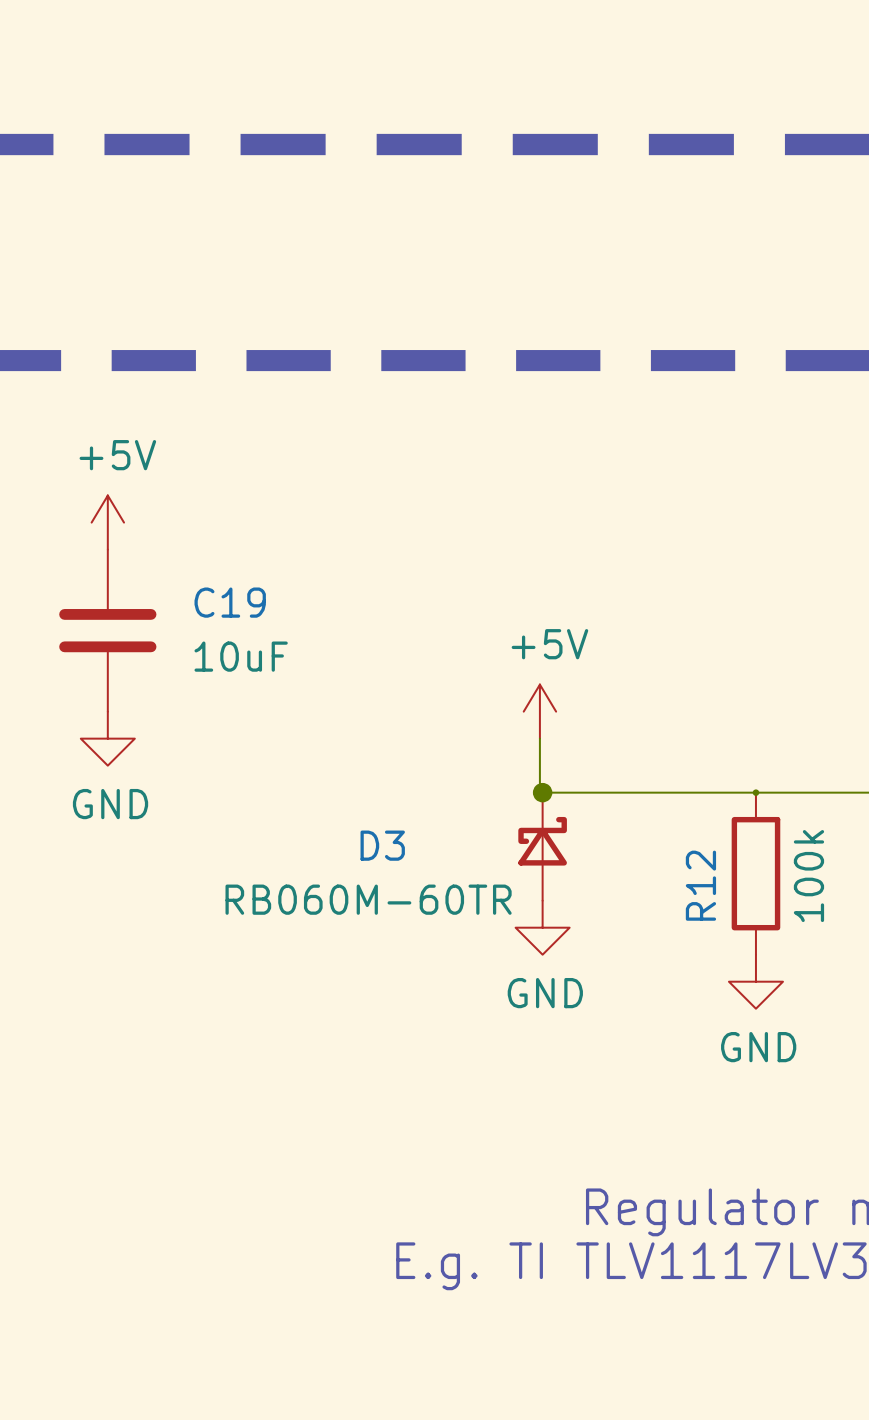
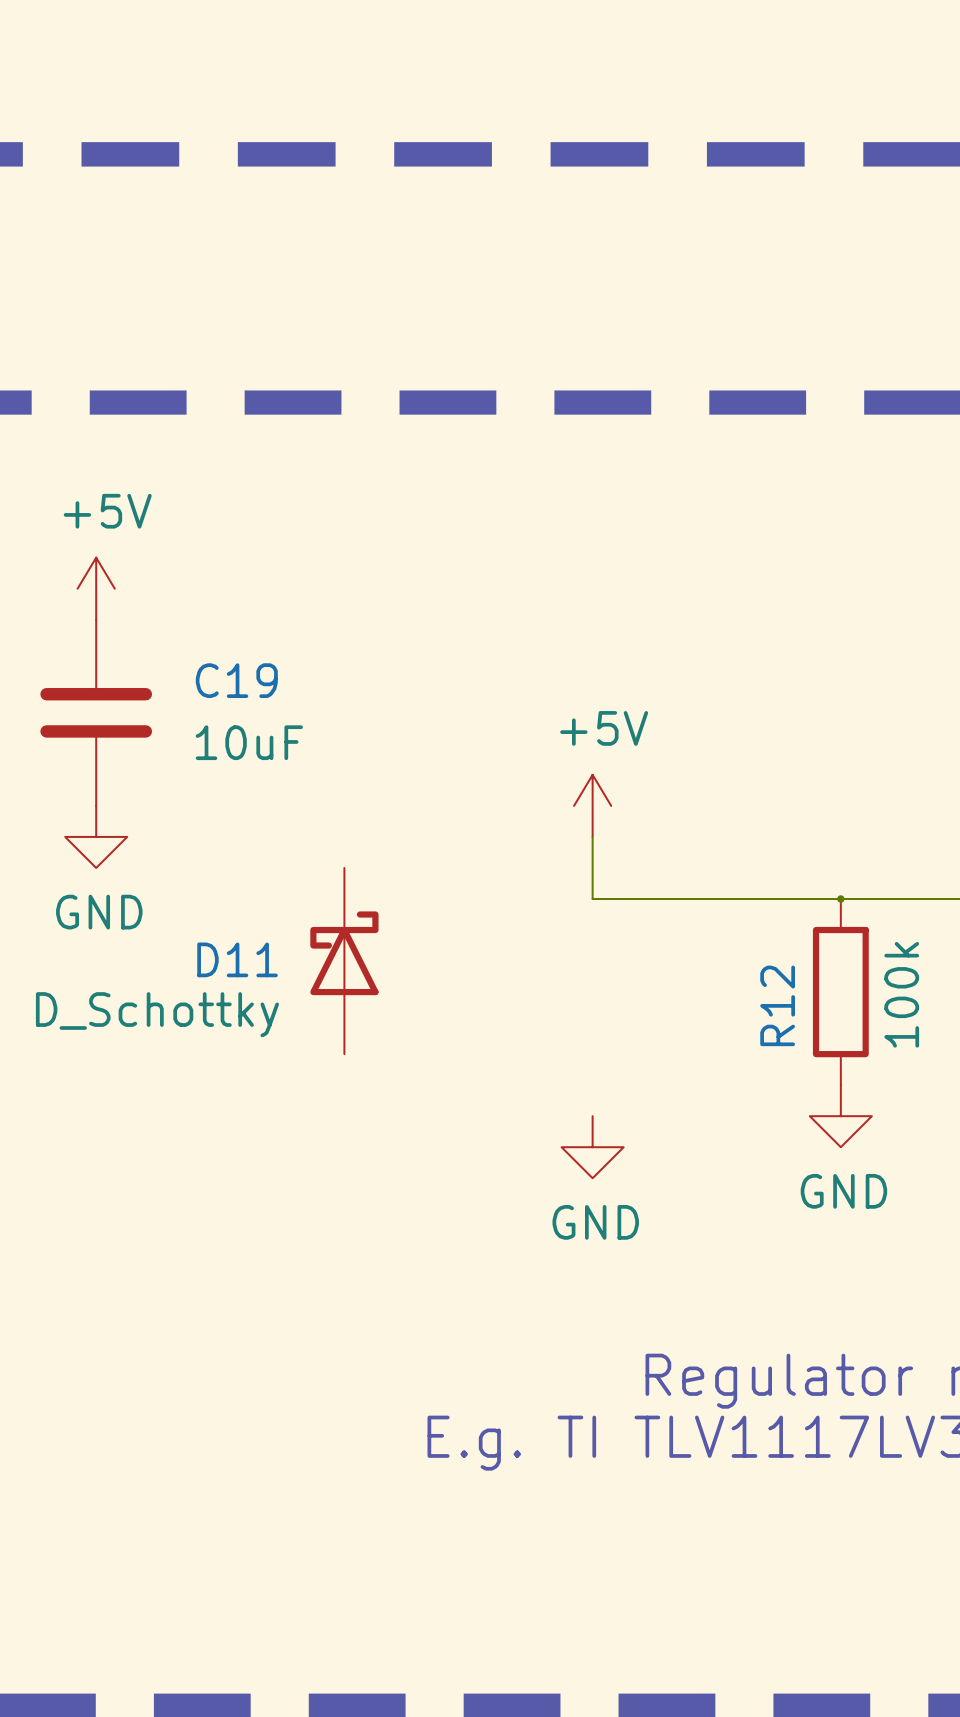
junction: (542, 792) -> none
D11: none -> D_Schottky (344, 961)
D3: RB060M-60TR (542, 846) -> none
power symbol position: GND (542, 927) -> GND (592, 1147)

